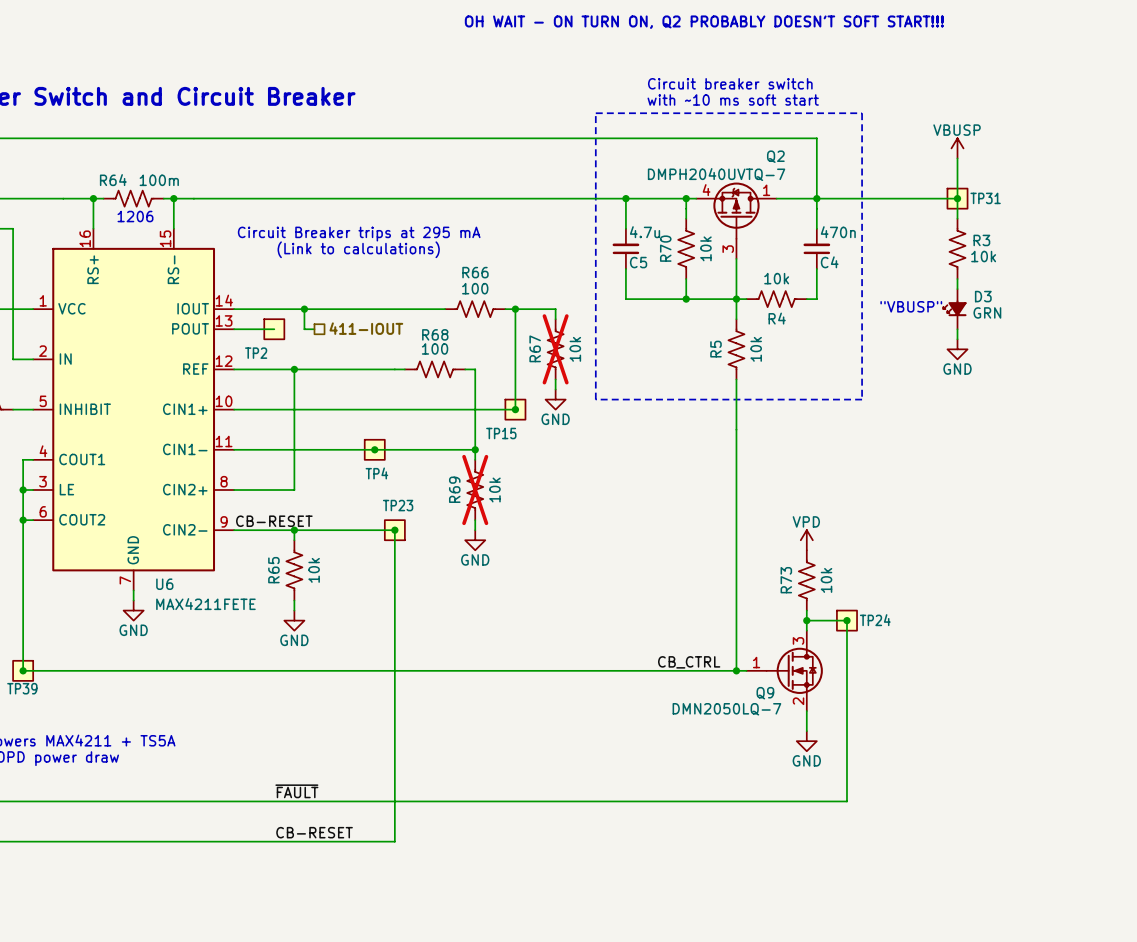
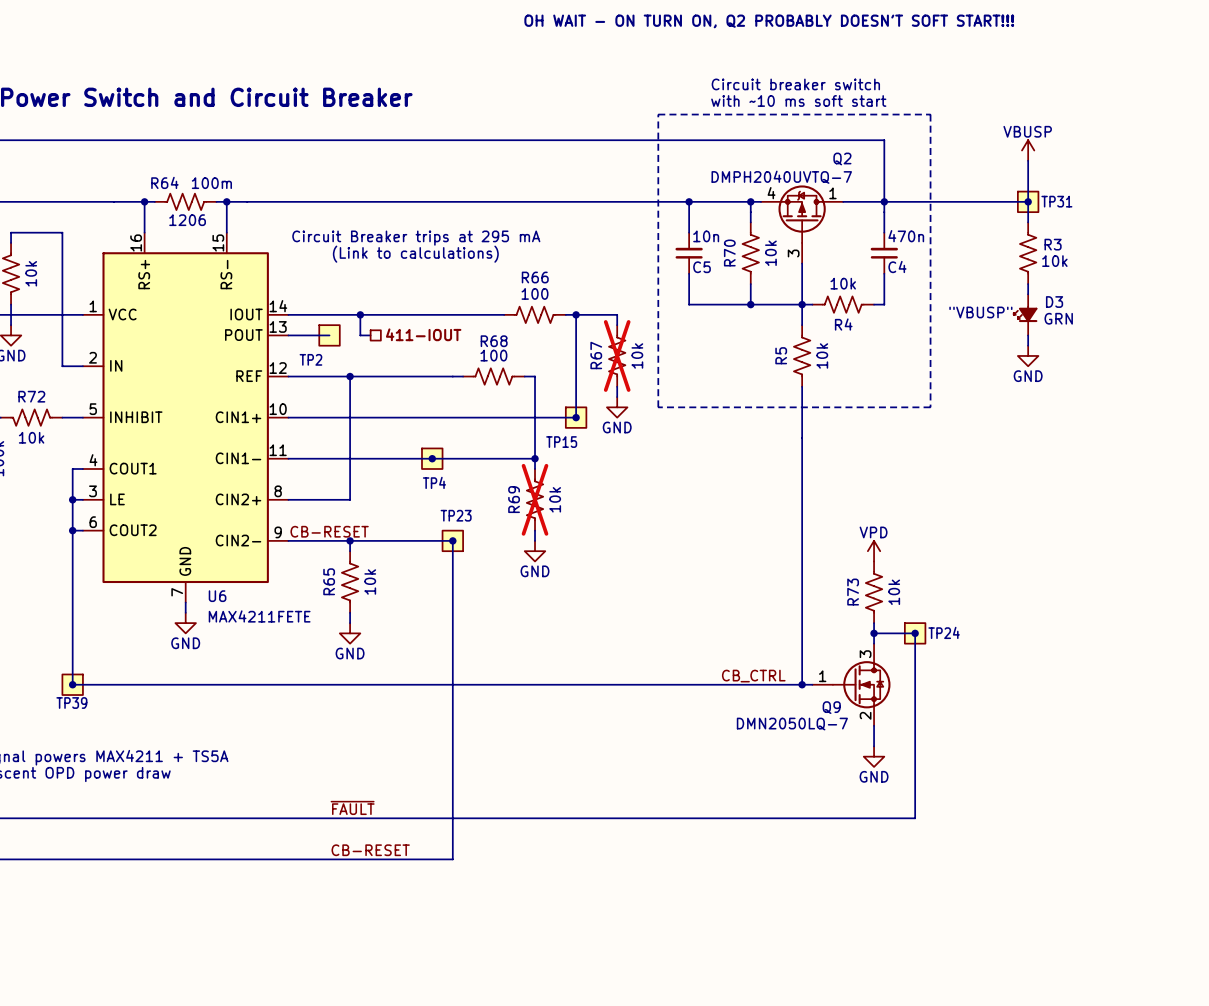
C5 value: 4.7u (645, 232) -> 10n (706, 236)

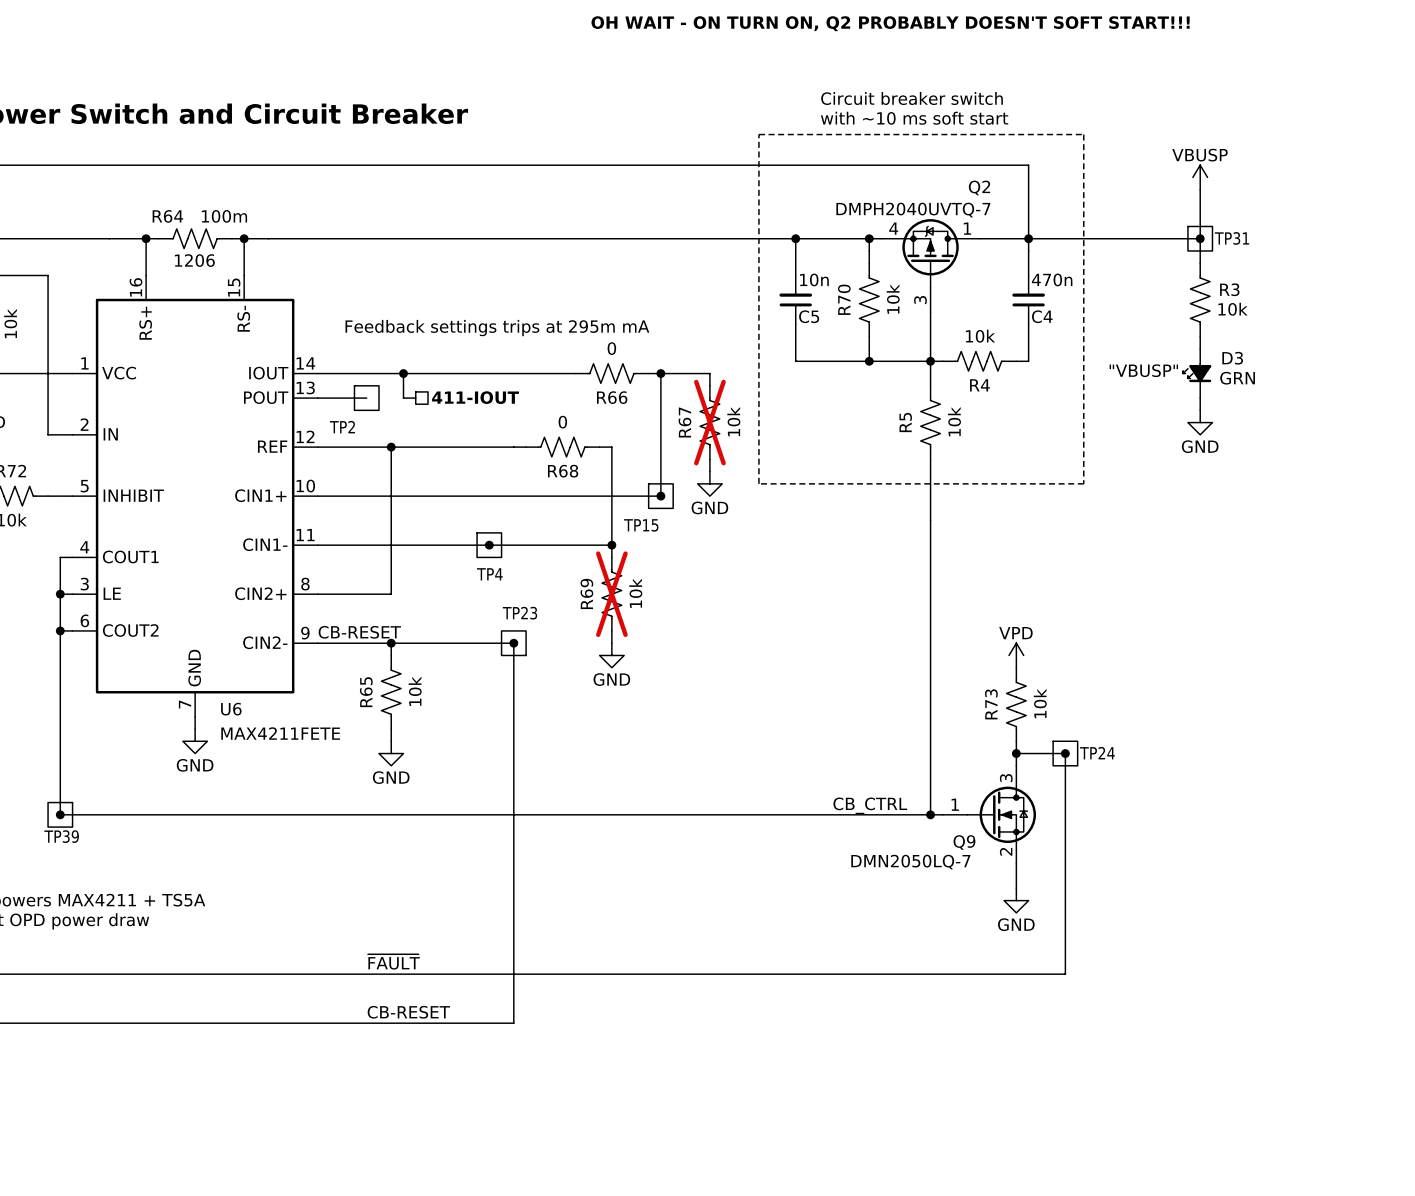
text: Circuit Breaker trips at 295 mA (416, 238) -> none
text: (Link to calculations) (415, 254) -> none
text: none -> Feedback settings trips at 295m mA (497, 328)
R66 name position: R66 (535, 277) -> R66 (612, 397)
R66 value: 100 (535, 293) -> 0 (611, 348)
R68 name position: R68 (494, 341) -> R68 (563, 471)
R68 value: 100 (493, 355) -> 0 (562, 422)

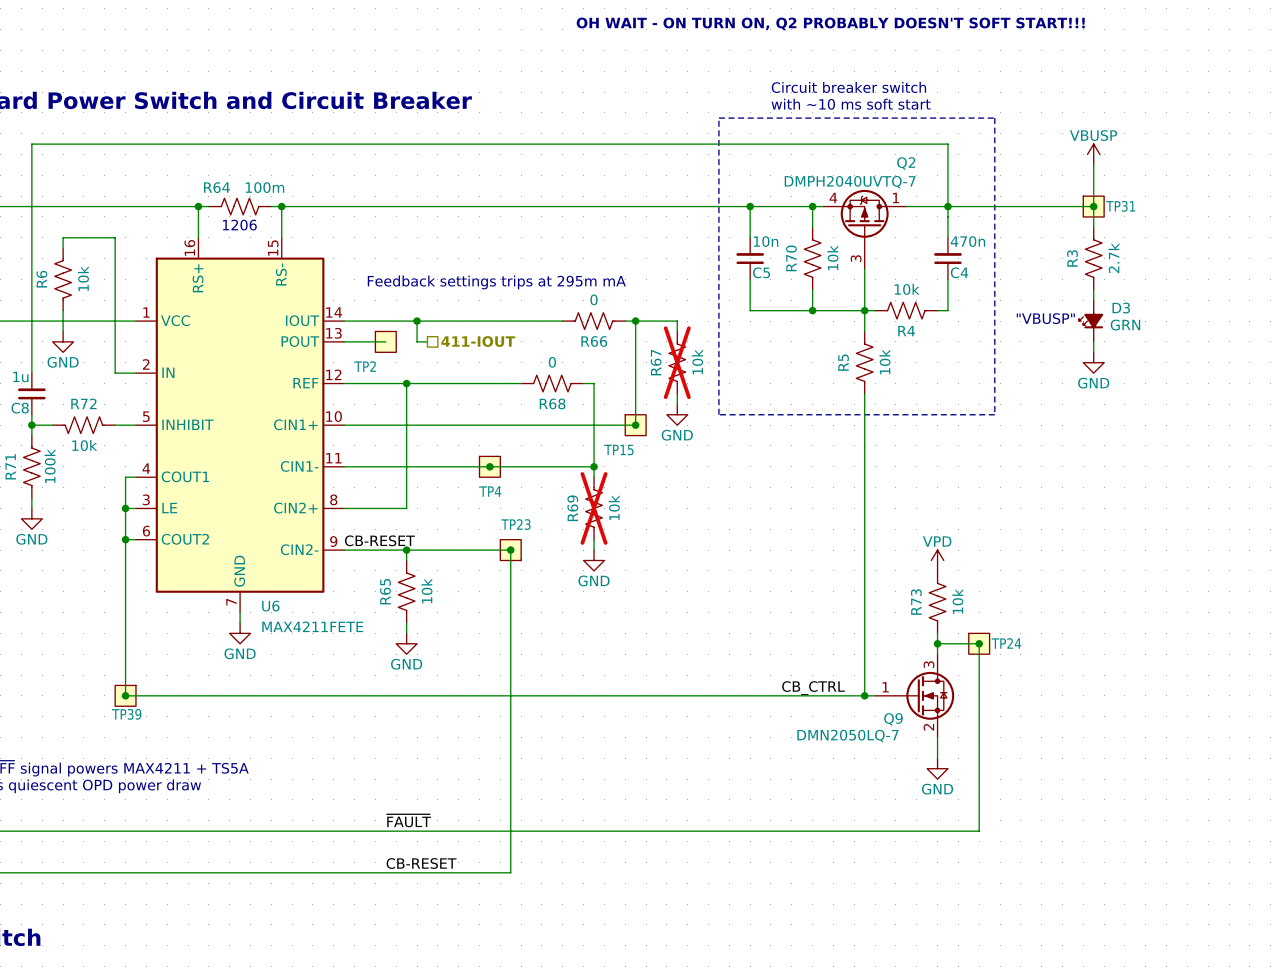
R3 name rotation: 0° (1229, 289) -> 90° counterclockwise (1072, 258)
R3 name position: R3 (1229, 289) -> R3 (1072, 258)
R3 value: 10k (1232, 309) -> 2.7k (1113, 258)

